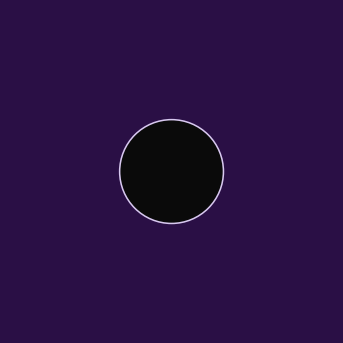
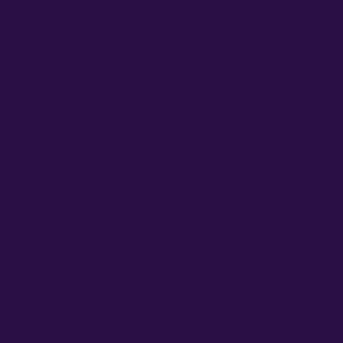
hole: (171, 171) -> none

